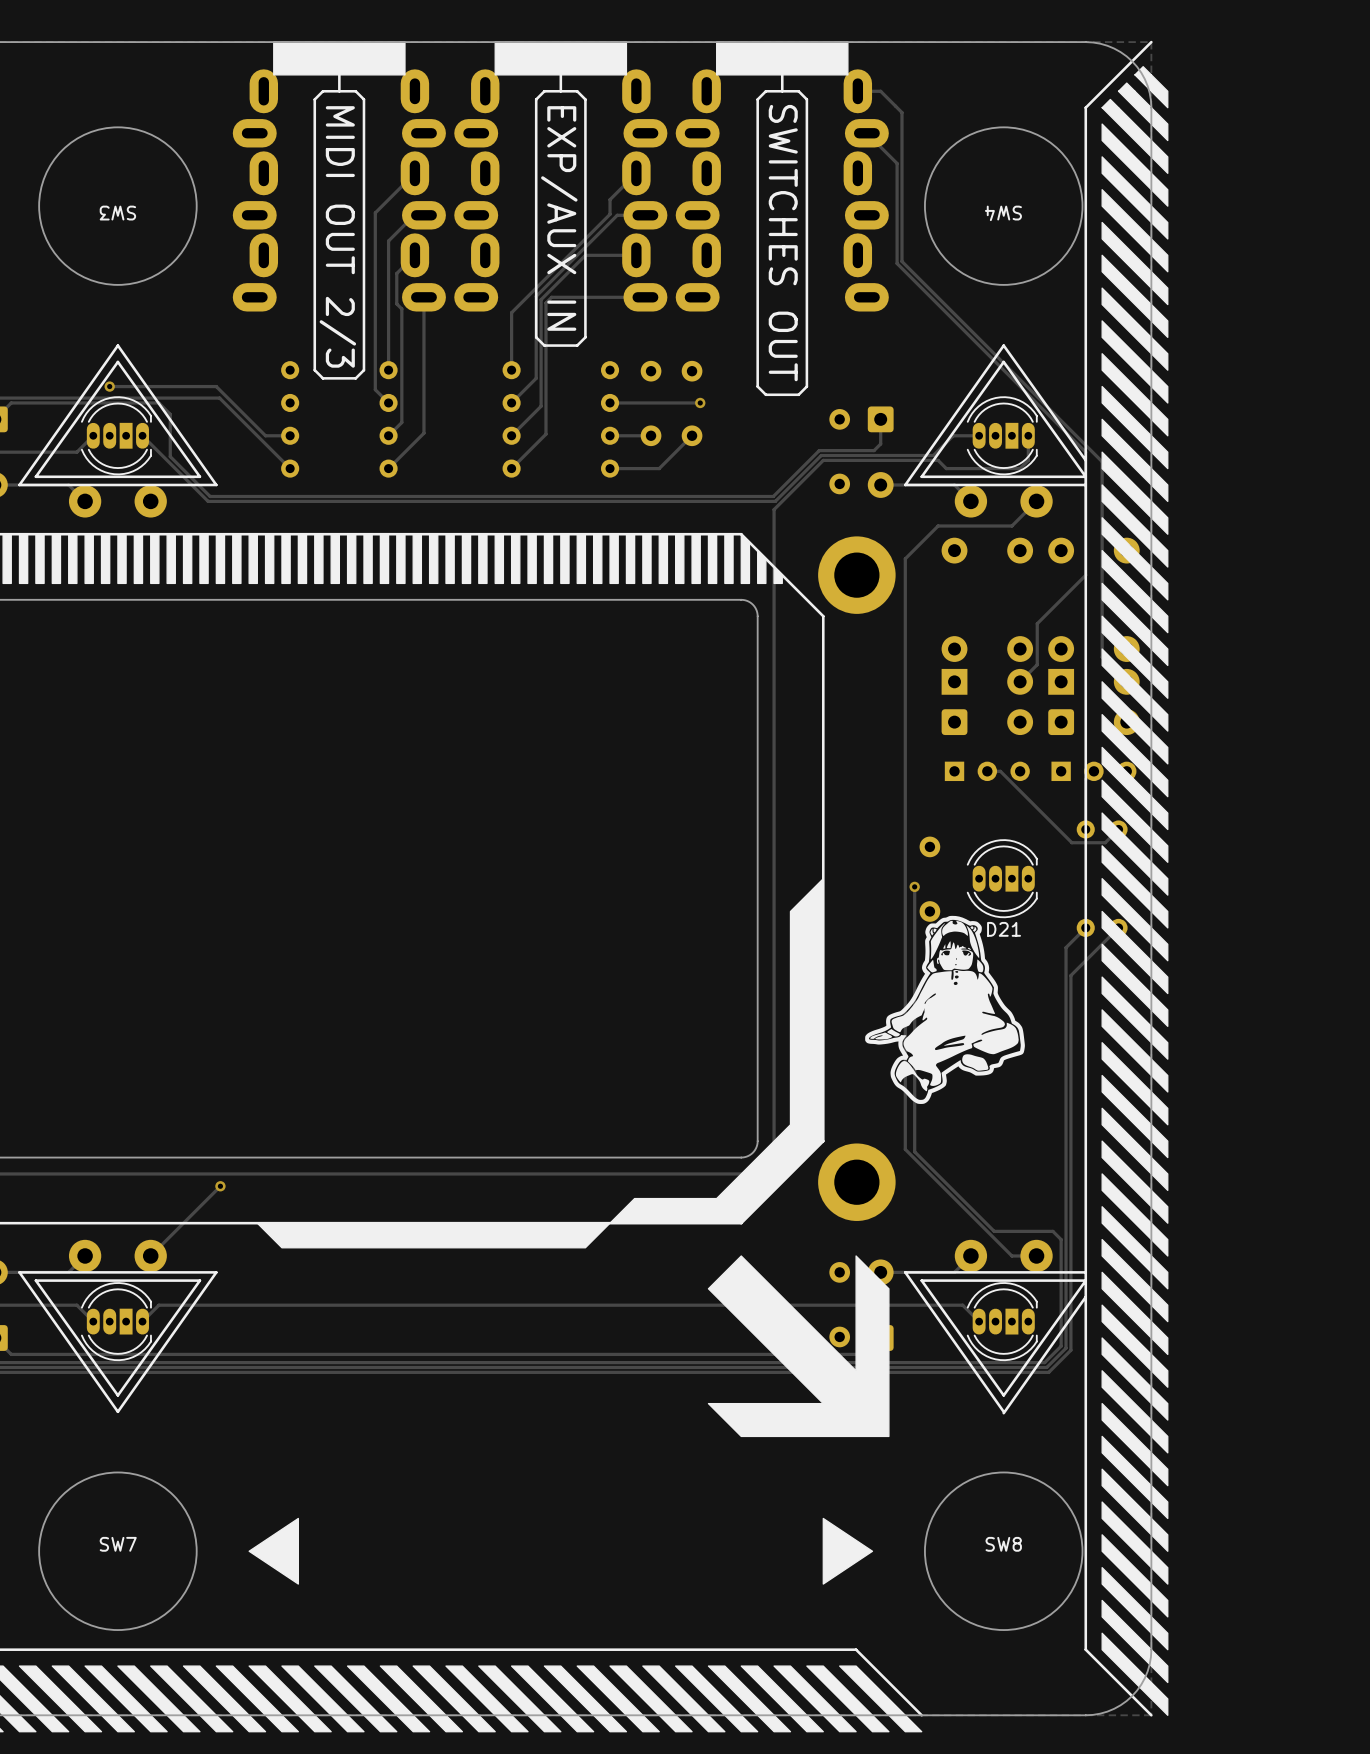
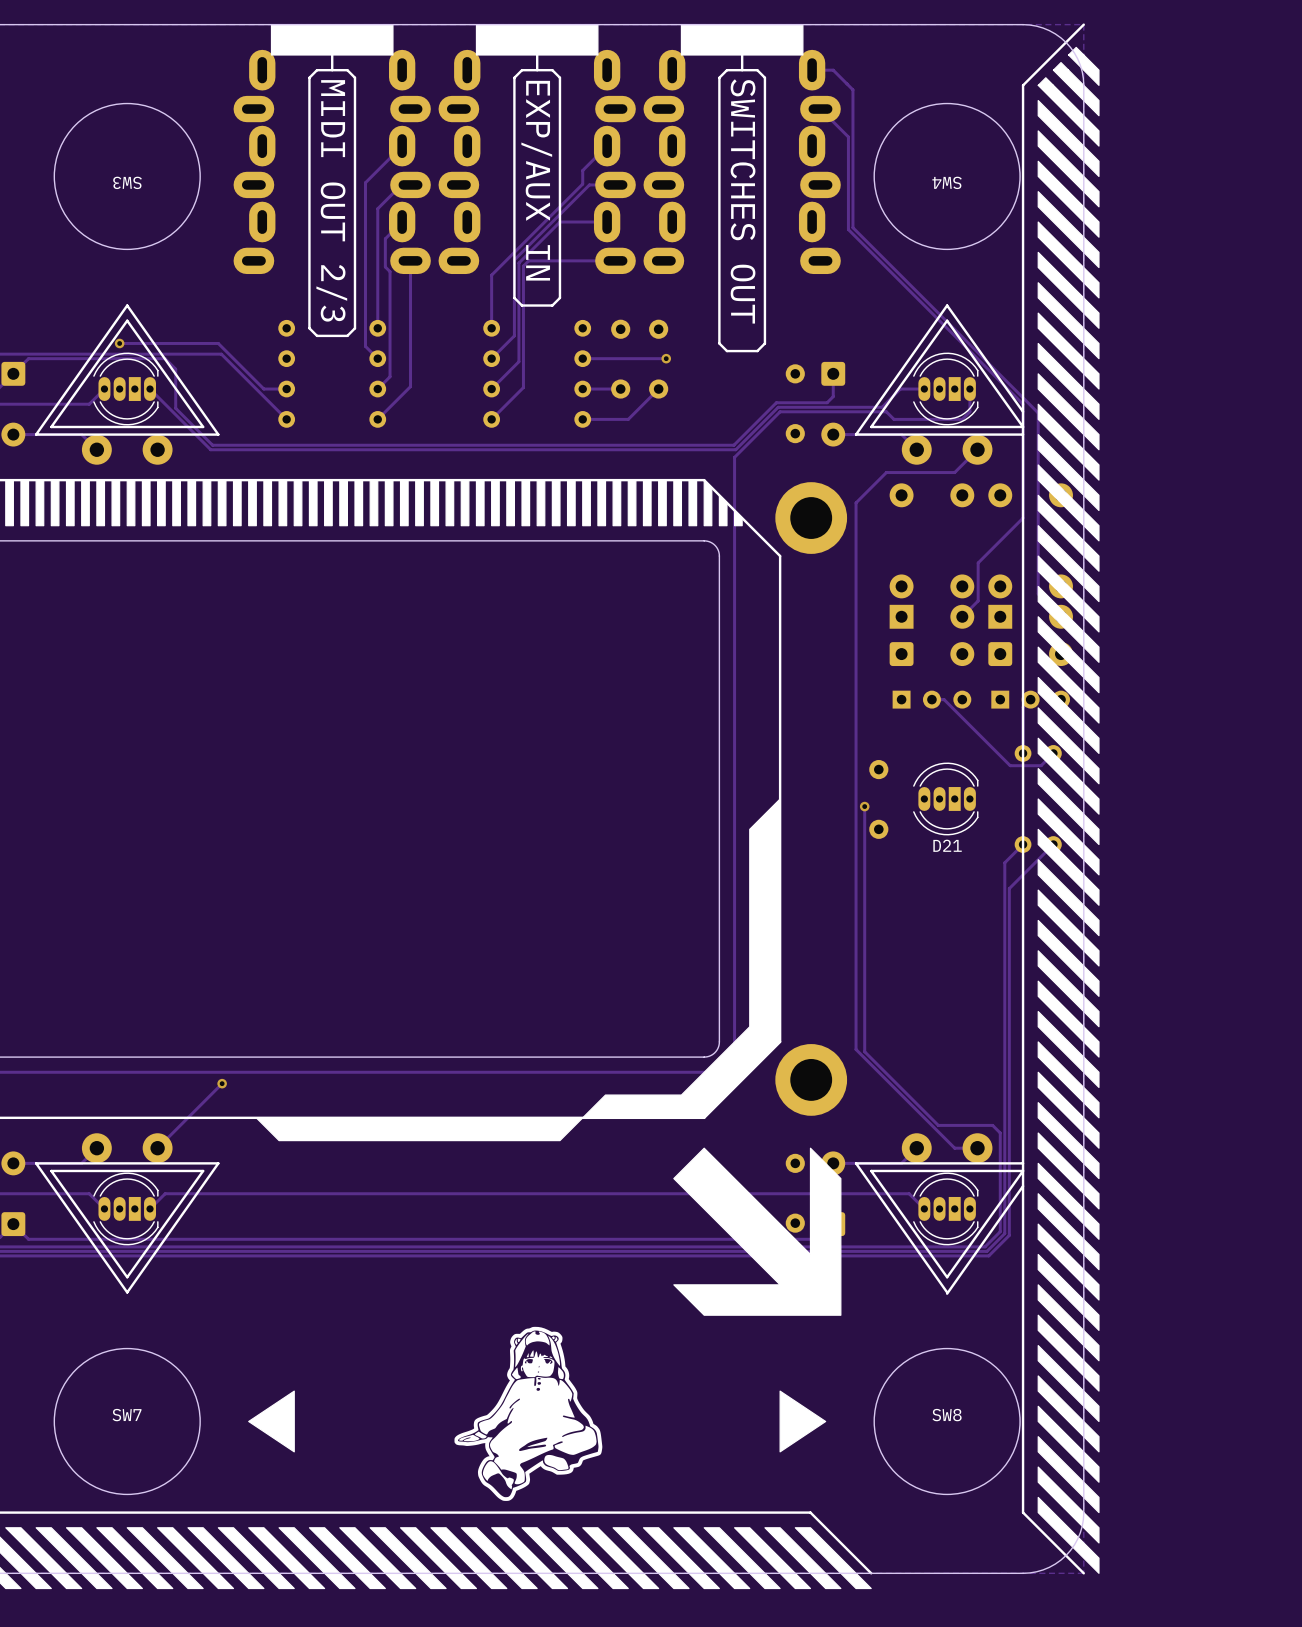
part: (945, 1009) -> none
drawing: none -> [454, 1326, 603, 1501]

